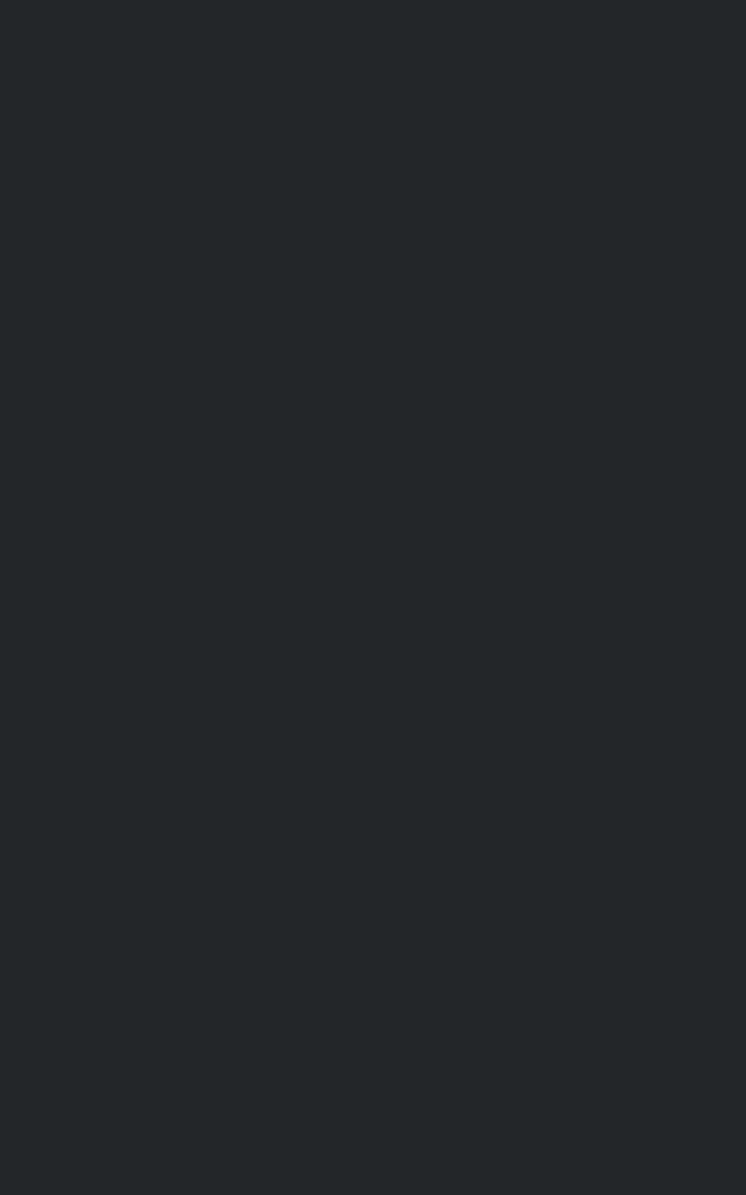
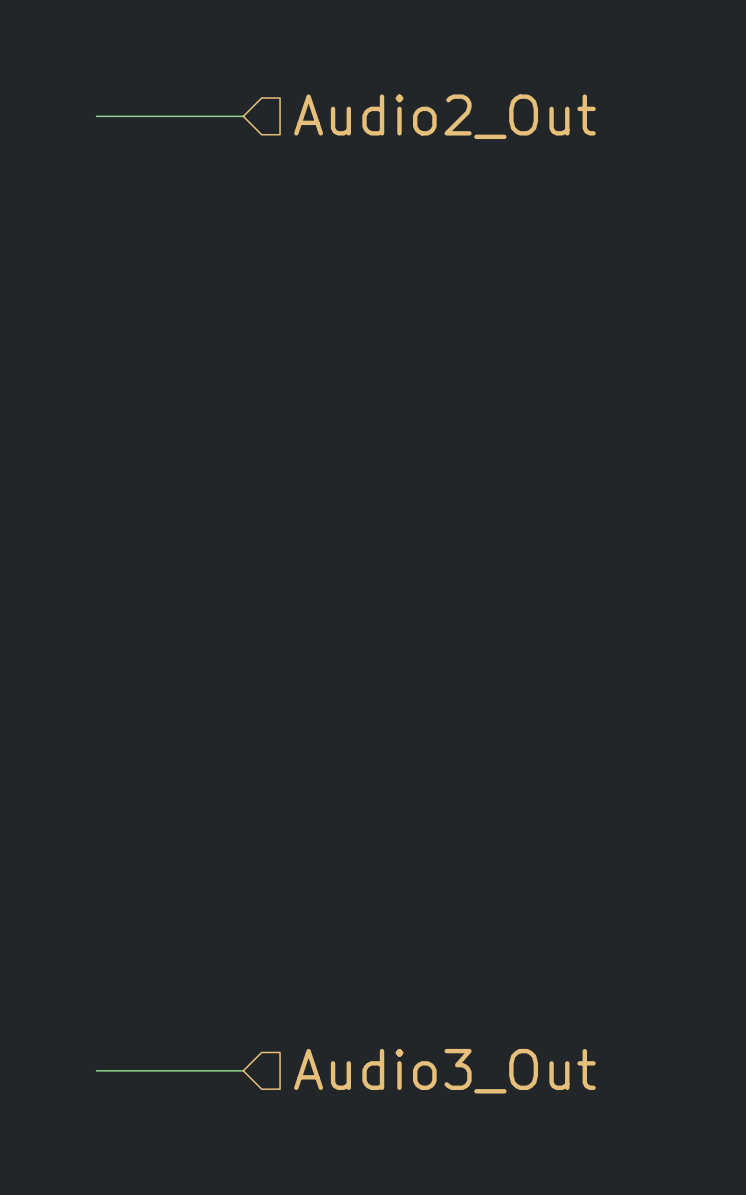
wire: none -> (96, 116) (243, 116)
hierarchical label: none -> Audio2_Out (444, 116)
wire: none -> (96, 1070) (243, 1070)
hierarchical label: none -> Audio3_Out (444, 1071)

